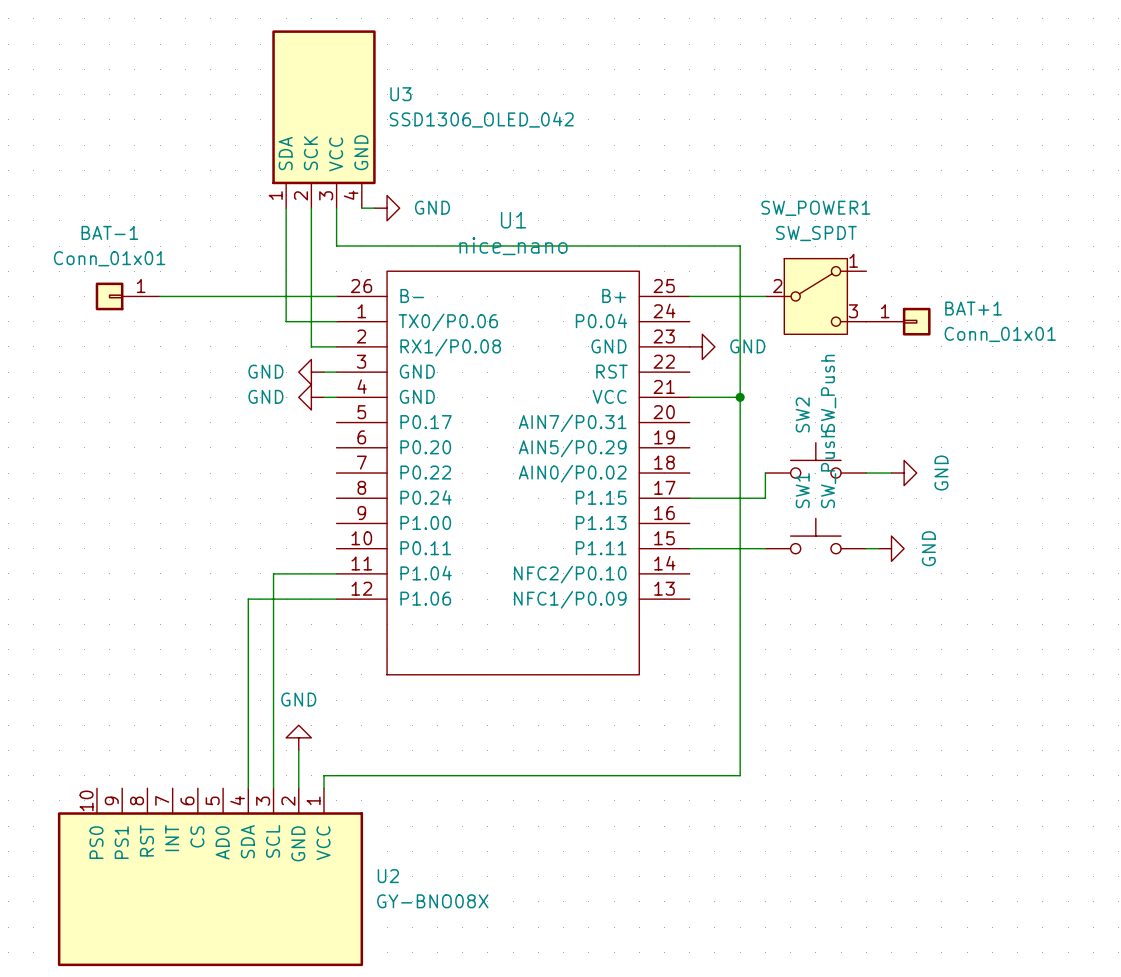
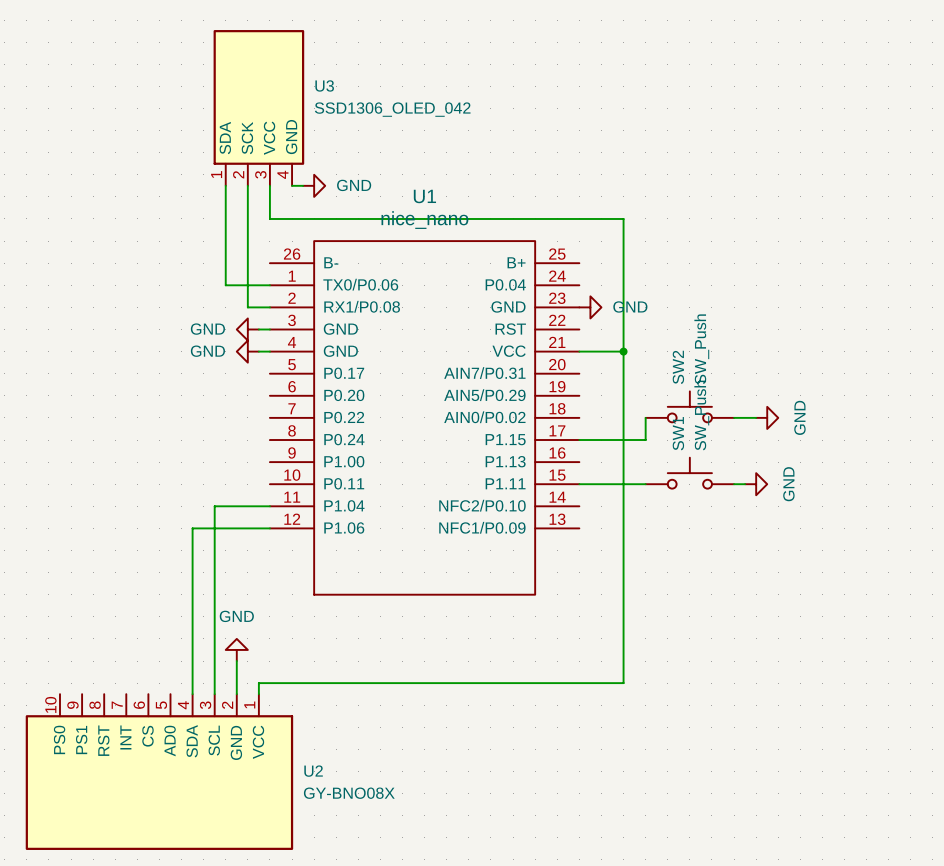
BAT-1: Conn_01x01 (127, 296) -> none
wire: (160, 296) (336, 296) -> none
wire: (689, 296) (765, 296) -> none
SW_POWER1: SW_SPDT (815, 296) -> none
BAT+1: Conn_01x01 (898, 321) -> none

